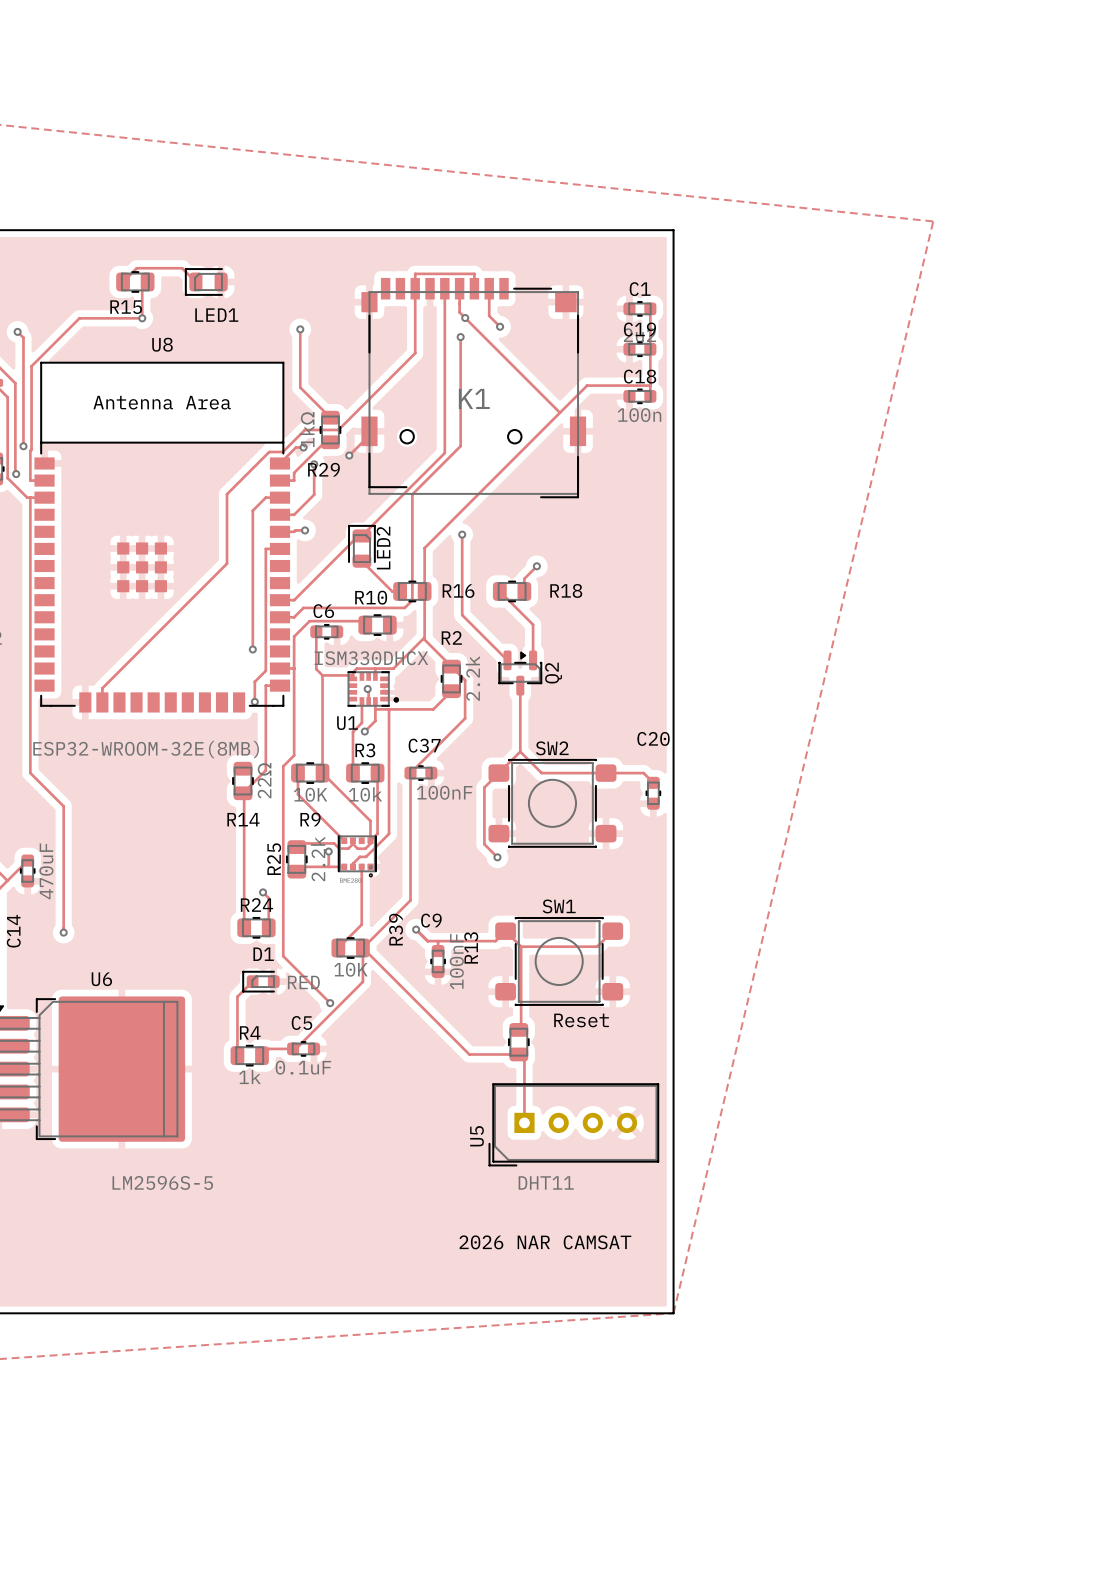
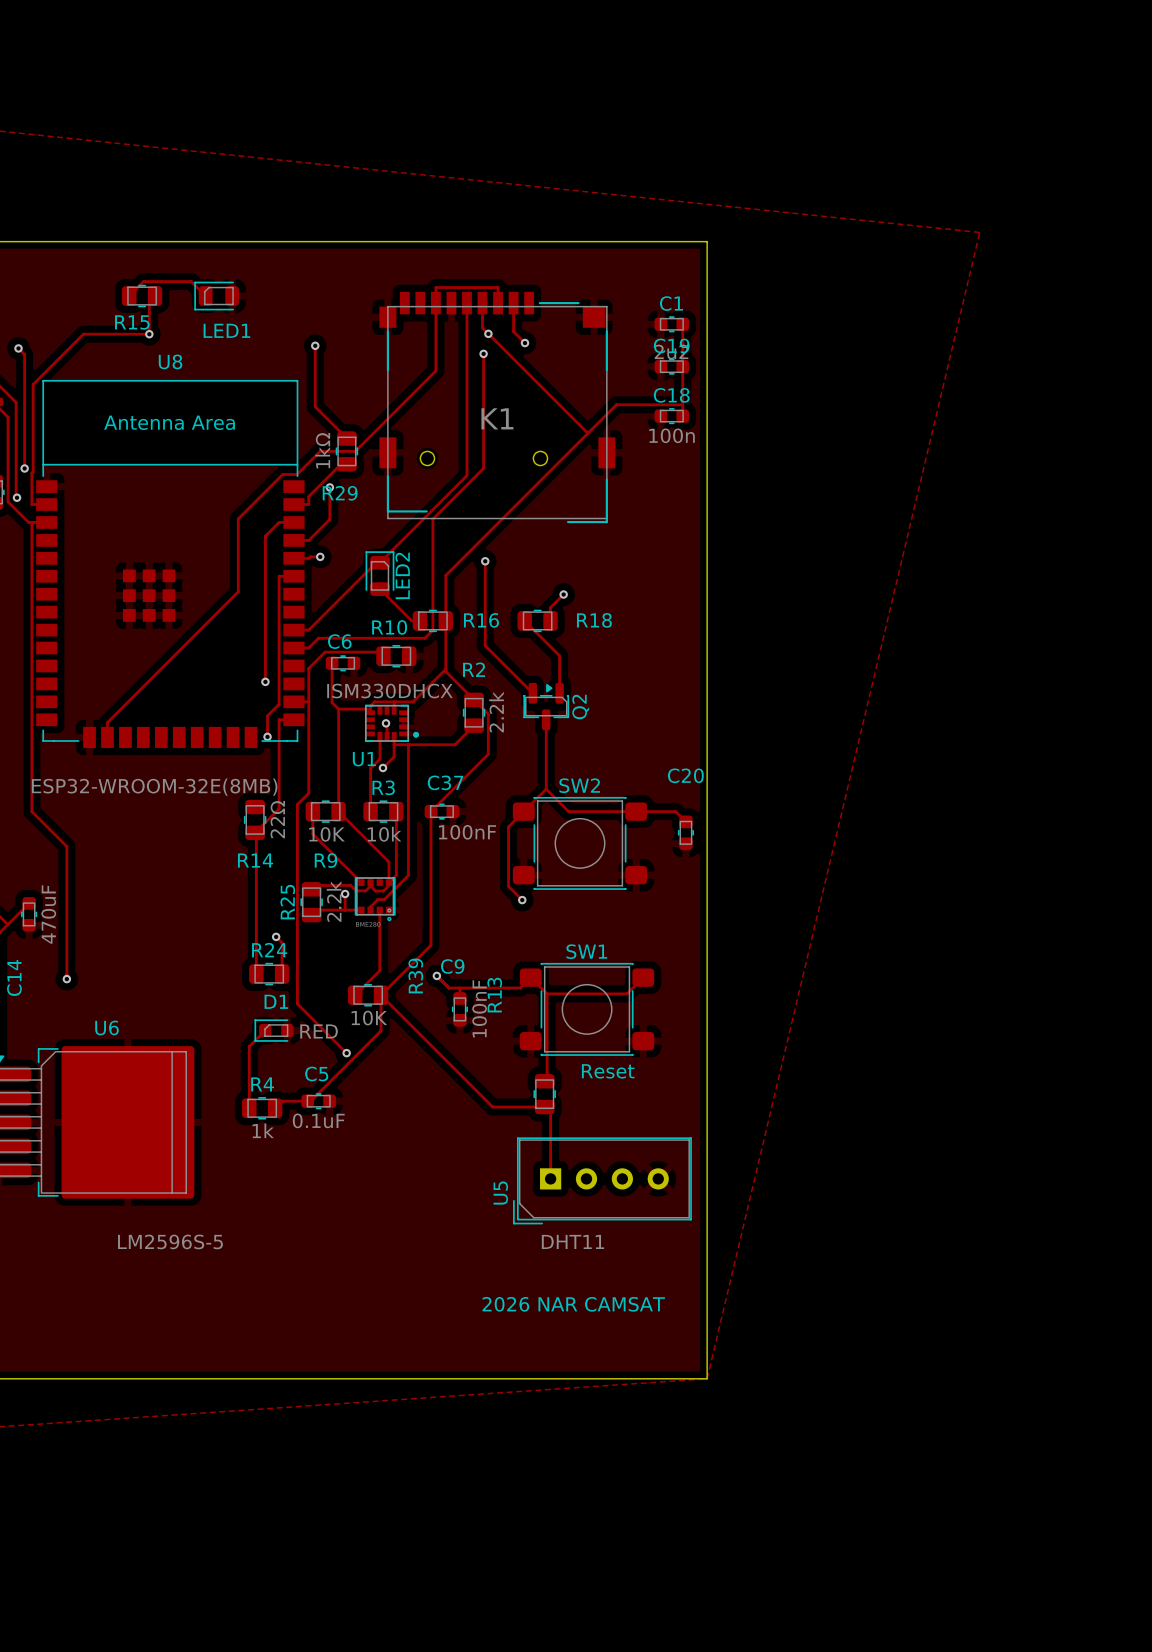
track: (369, 431) (369, 435) (349, 455) -> none
track: (303, 447) (296, 447) (279, 463) -> none
via: (303, 447) -> none
via: (349, 455) -> none

